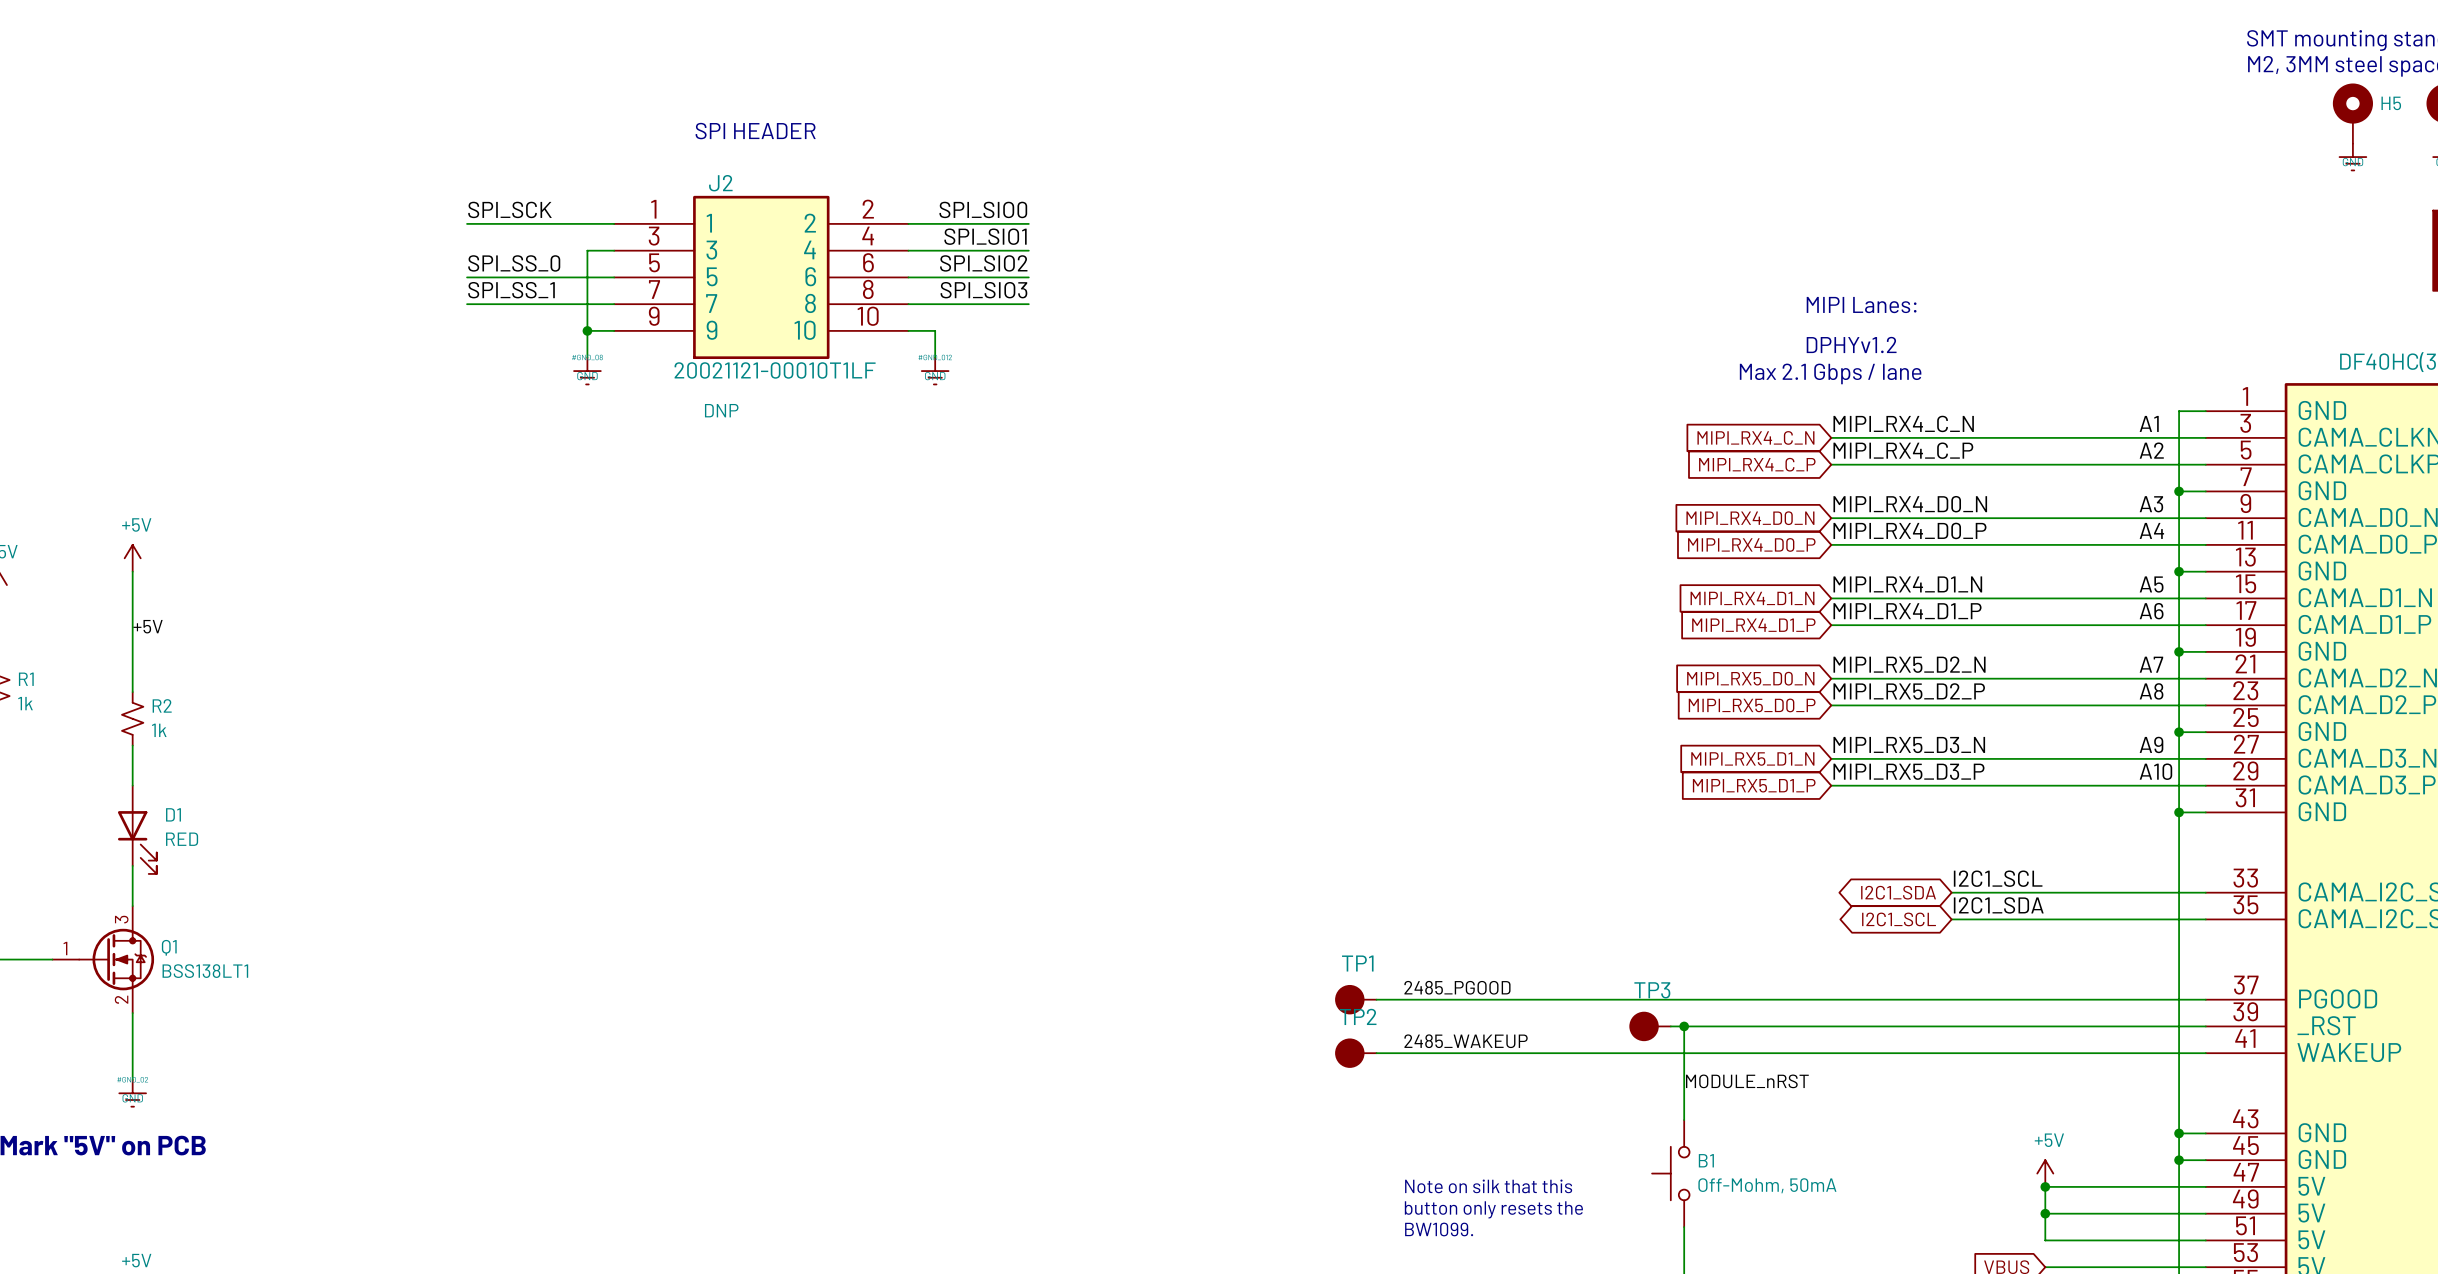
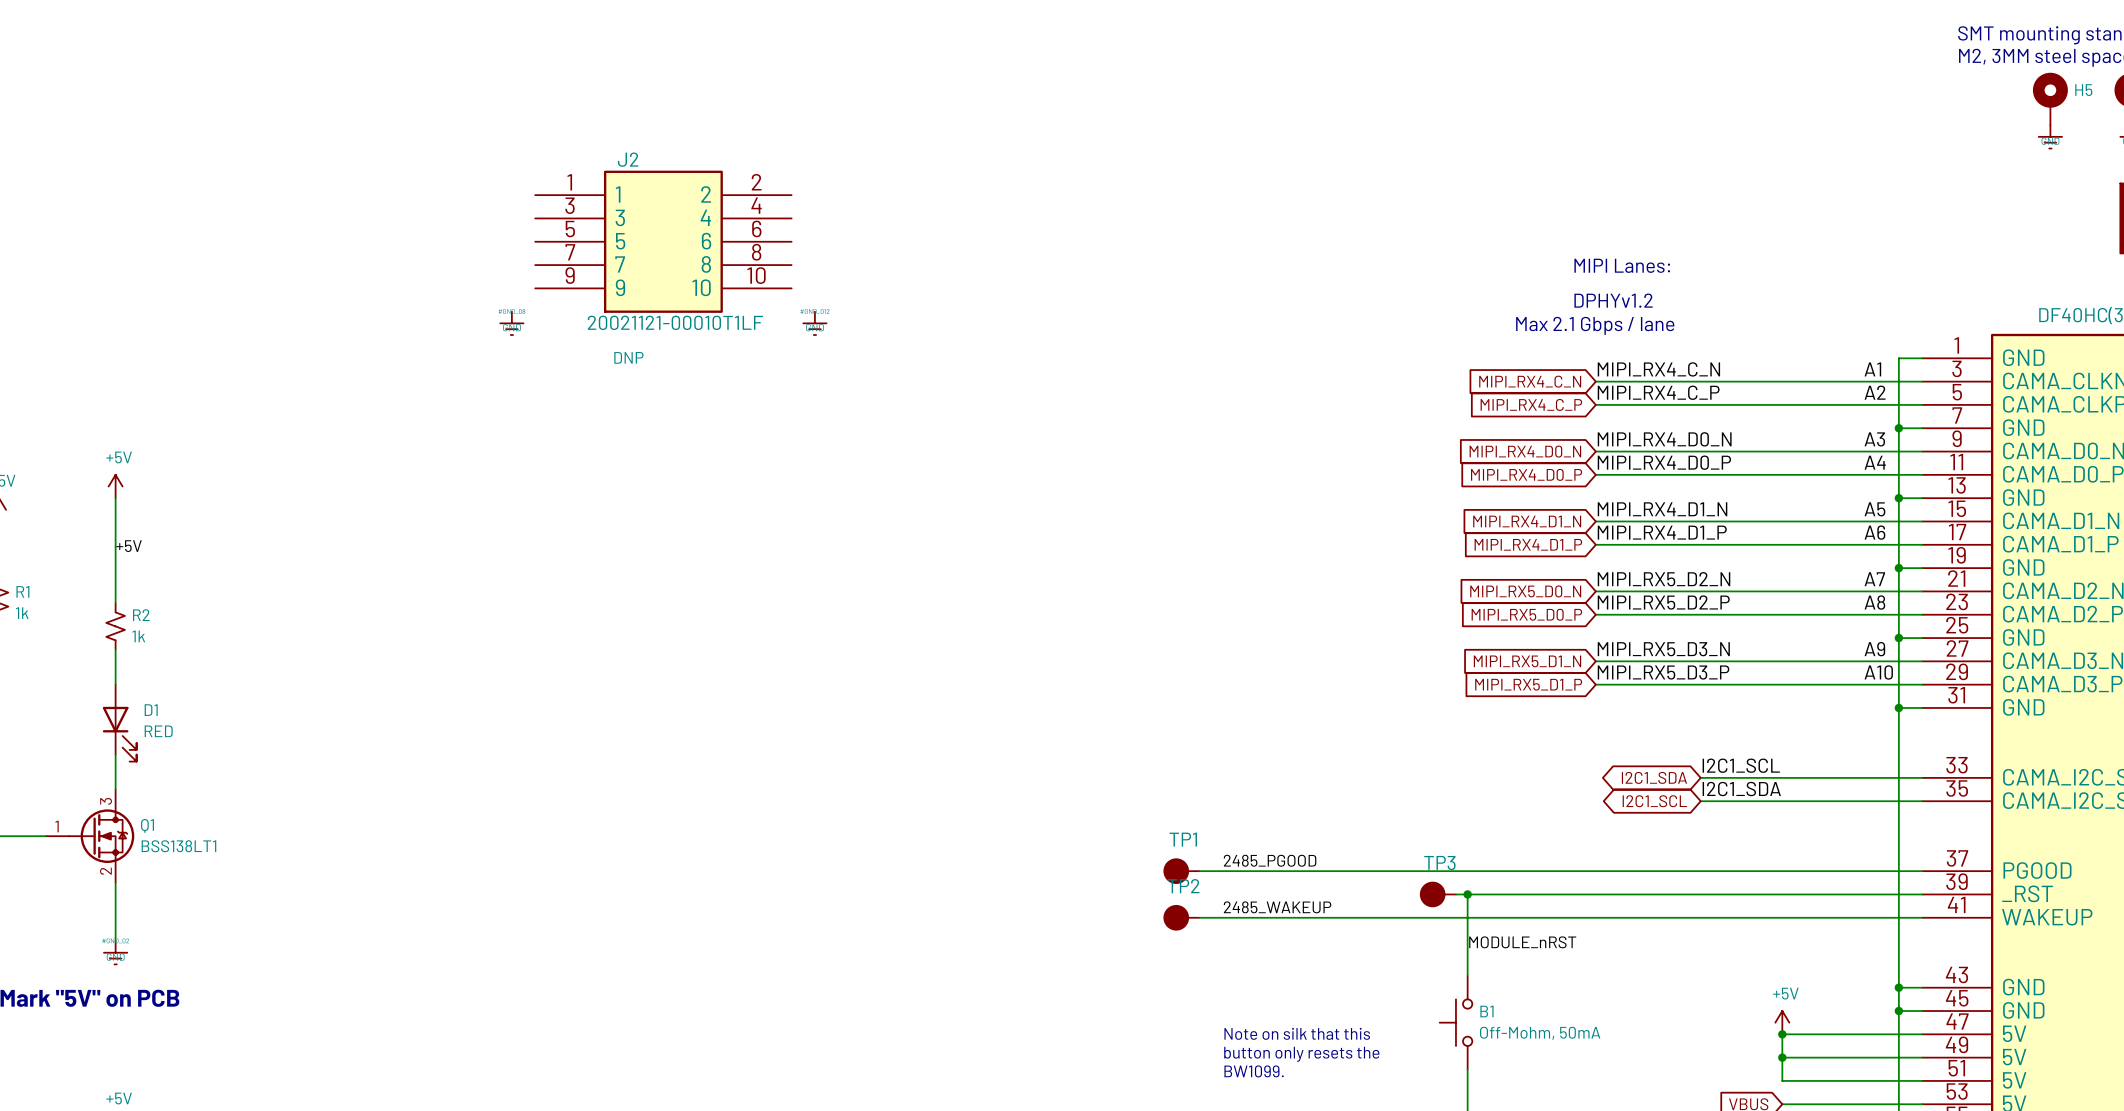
text: SPI HEADER (755, 131) -> none
label: SPI_SCK (509, 209) -> none
label: SPI_SIO0 (983, 209) -> none
wire: (467, 223) (614, 223) -> none
wire: (908, 223) (1028, 223) -> none
label: SPI_SIO1 (985, 236) -> none
wire: (614, 250) (587, 250) (587, 357) -> none
wire: (908, 250) (1028, 250) -> none
label: SPI_SS_0 (514, 263) -> none
label: SPI_SIO2 (983, 263) -> none
wire: (467, 277) (614, 277) -> none
wire: (908, 277) (1028, 277) -> none
label: SPI_SS_1 (511, 290) -> none
label: SPI_SIO3 (983, 290) -> none
wire: (467, 304) (614, 304) -> none
wire: (908, 304) (1028, 304) -> none
wire: (587, 330) (614, 330) -> none
junction: (587, 330) -> none
wire: (908, 330) (935, 330) (935, 357) -> none

